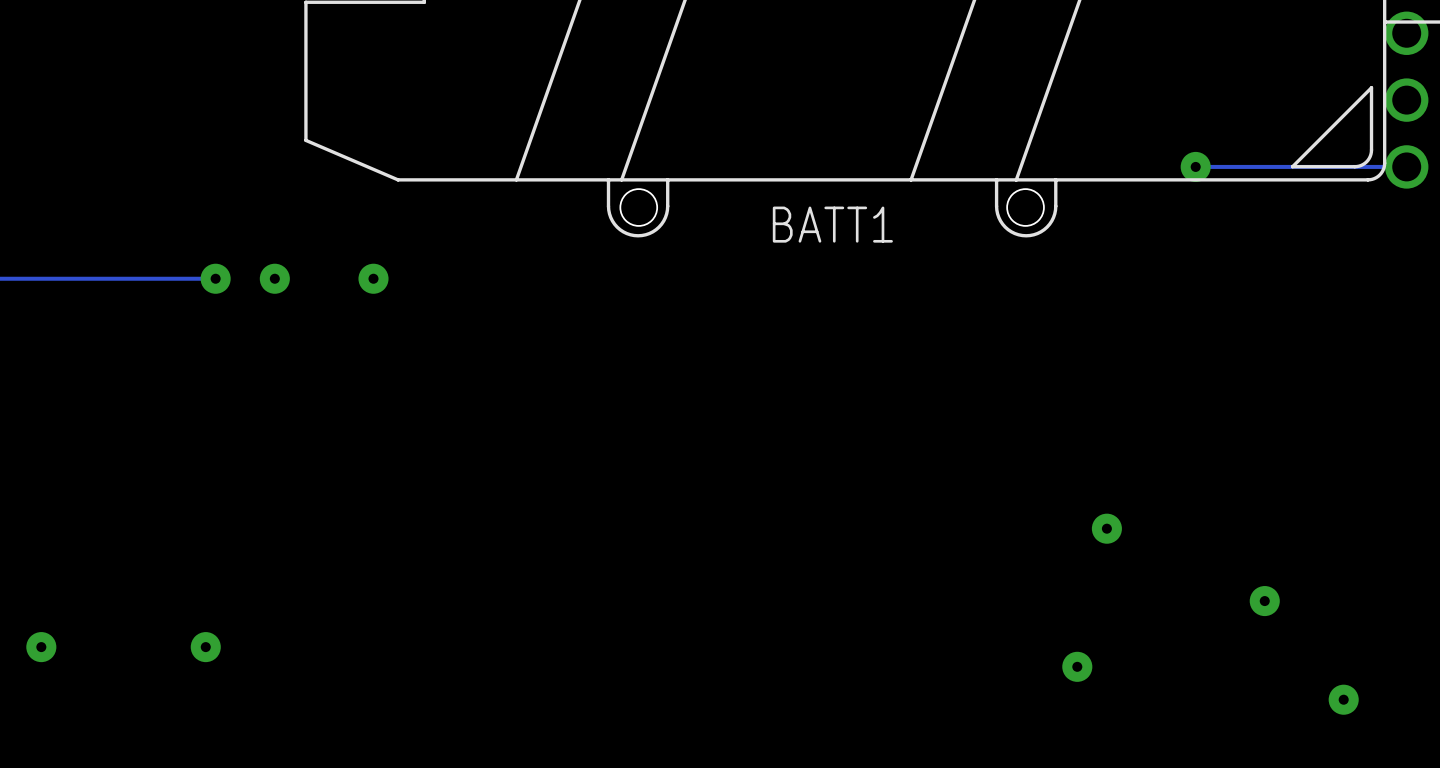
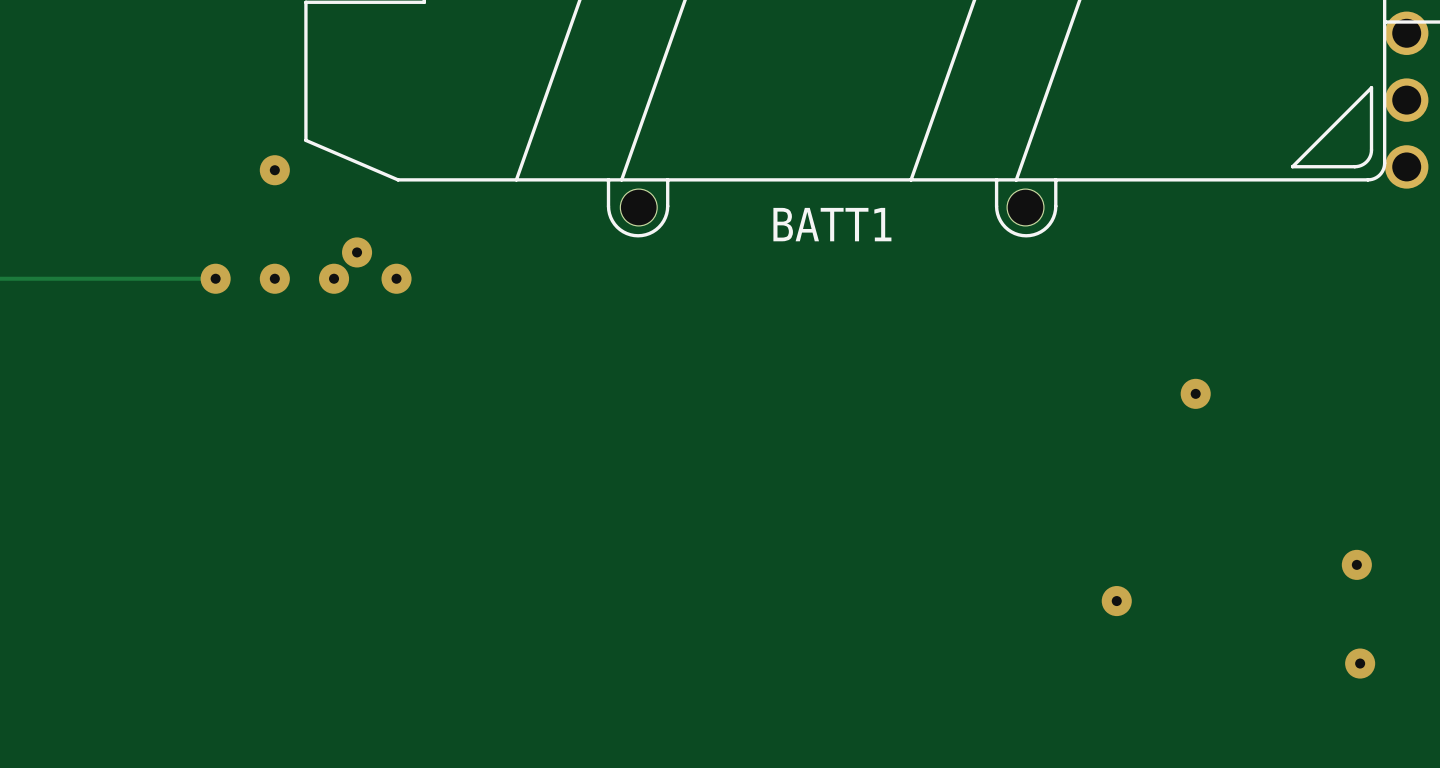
via: (1195, 166) -> none
track: (1406, 166) (1195, 166) -> none
via: none -> (274, 170)
via: none -> (357, 252)
via: none -> (334, 278)
via: (373, 278) -> none
via: none -> (396, 278)
via: none -> (1195, 393)
via: (1106, 528) -> none
via: none -> (1356, 564)
via: none -> (1116, 601)
via: (1264, 601) -> none
via: (41, 647) -> none
via: (205, 647) -> none
via: (1077, 666) -> none
via position: (1343, 699) -> (1360, 663)

